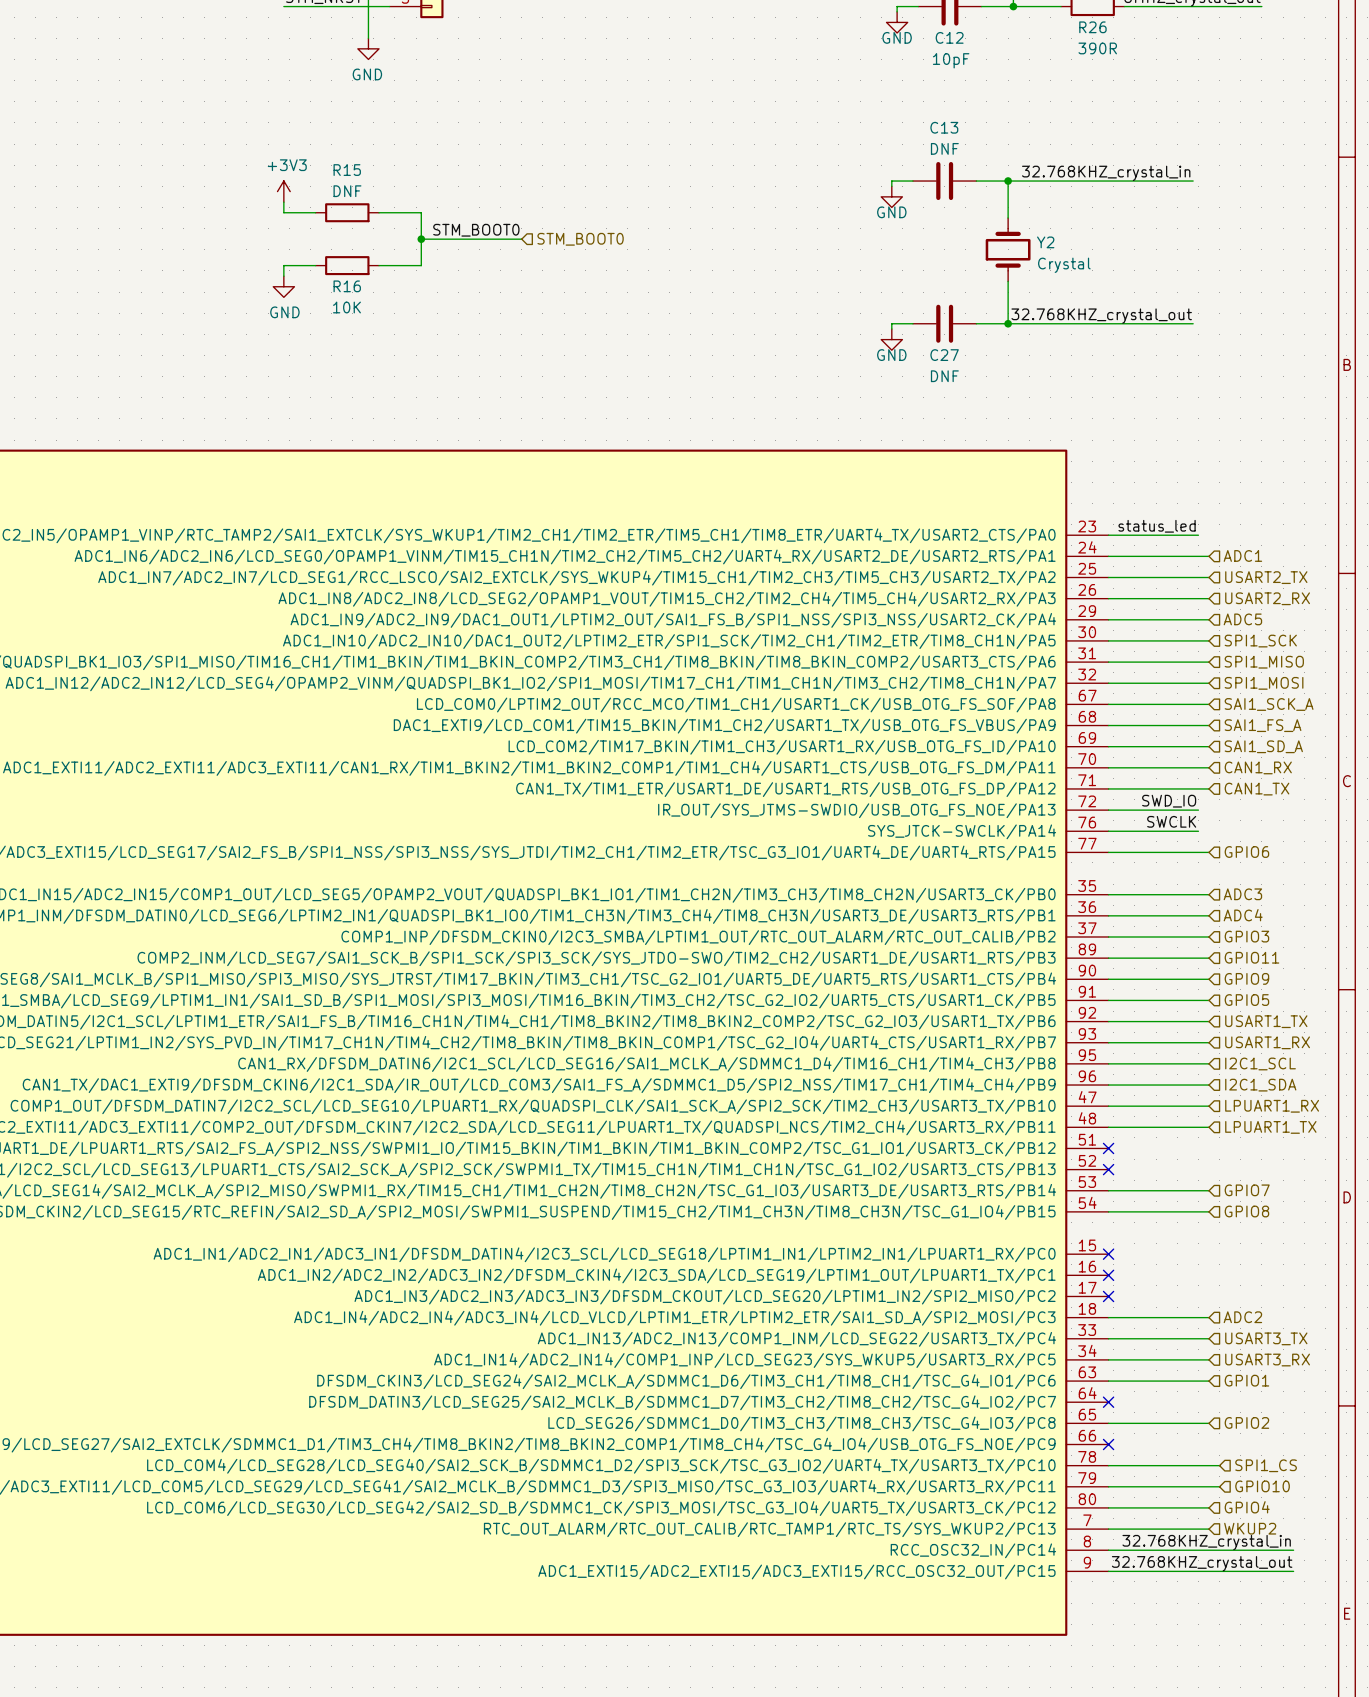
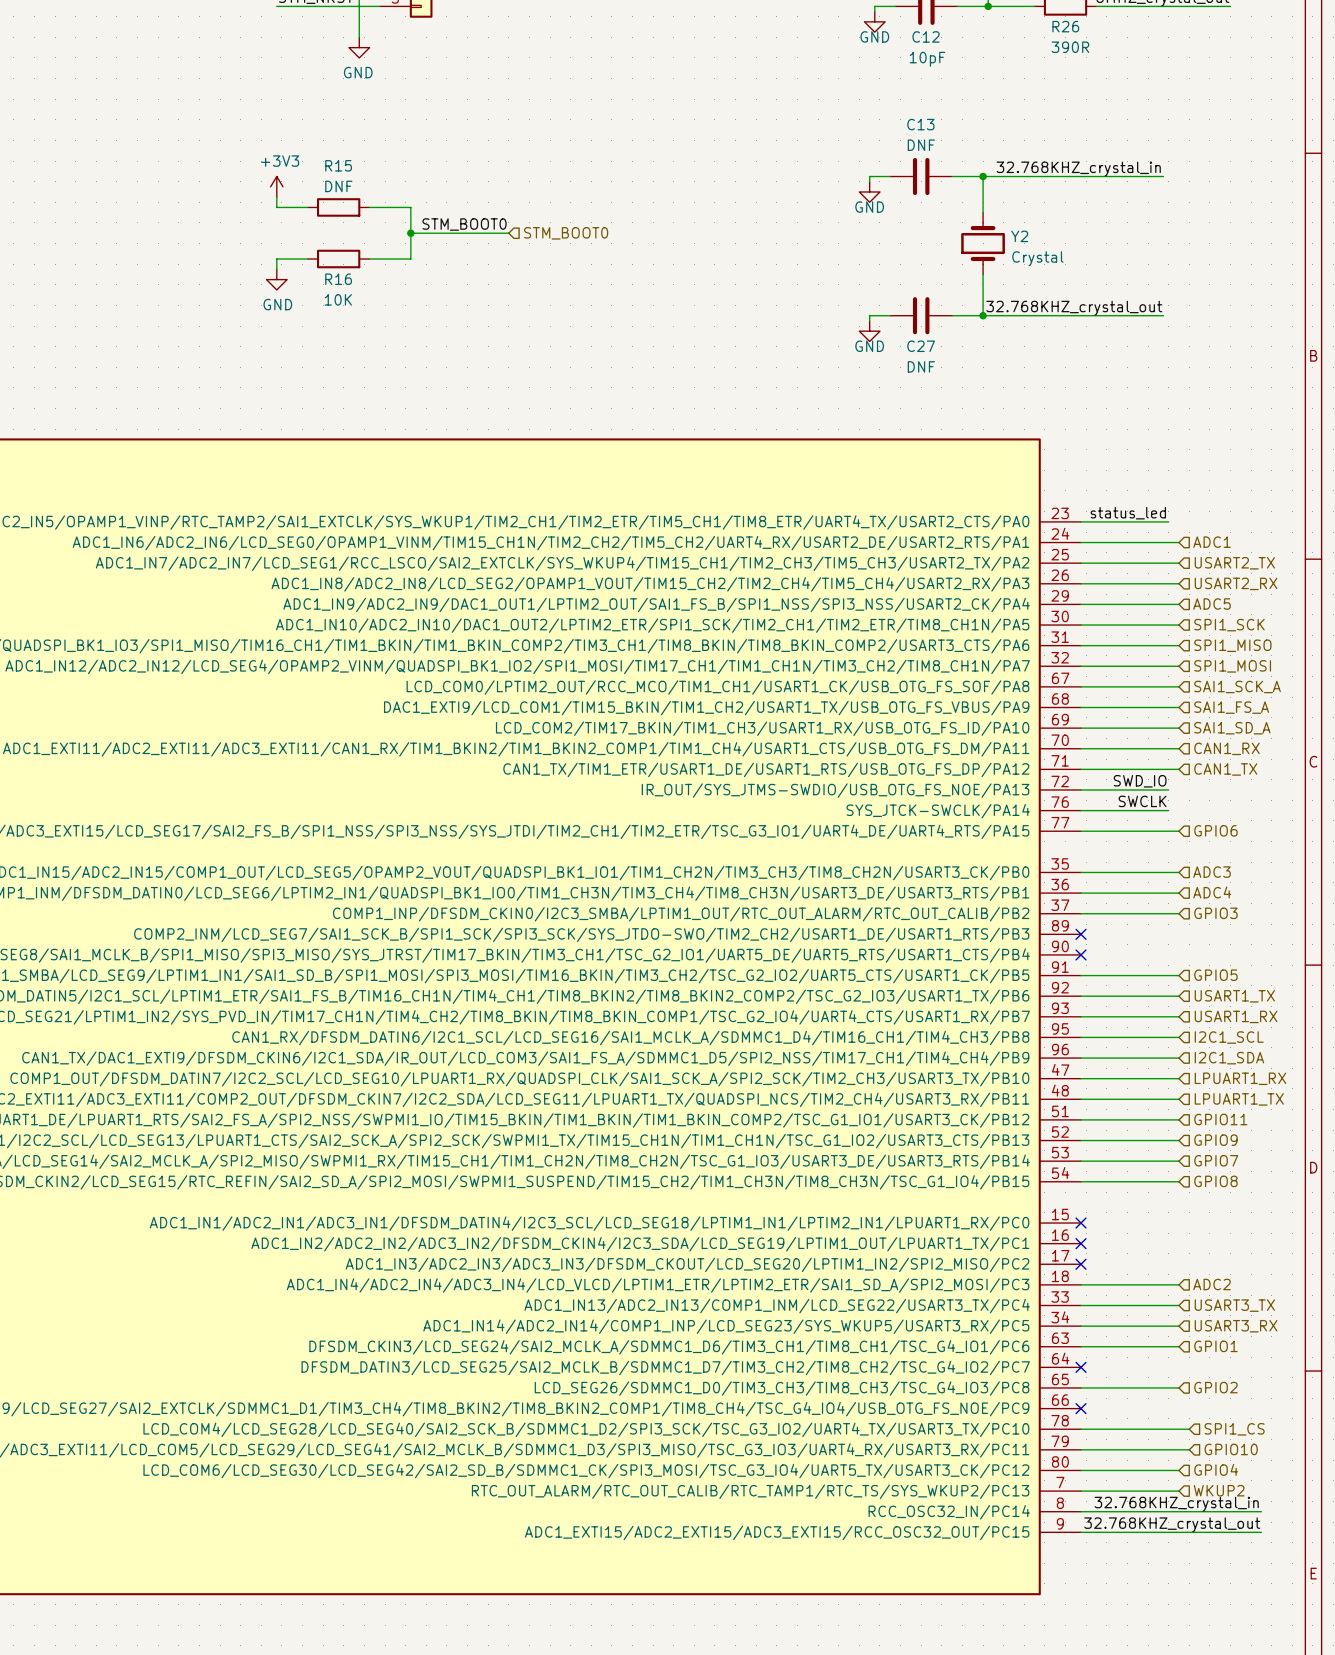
hierarchical label position: GPIO11 (1251, 957) -> GPIO11 (1220, 1119)
wire: (1108, 958) (1209, 958) -> none
no-connect mark: none -> (1081, 934)
hierarchical label position: GPIO9 (1246, 978) -> GPIO9 (1215, 1140)
wire: (1108, 979) (1209, 979) -> (1081, 1119) (1178, 1119)
no-connect mark: none -> (1081, 954)
no-connect mark: (1108, 1148) -> none
wire: none -> (1081, 1140) (1178, 1140)
no-connect mark: (1108, 1169) -> none

